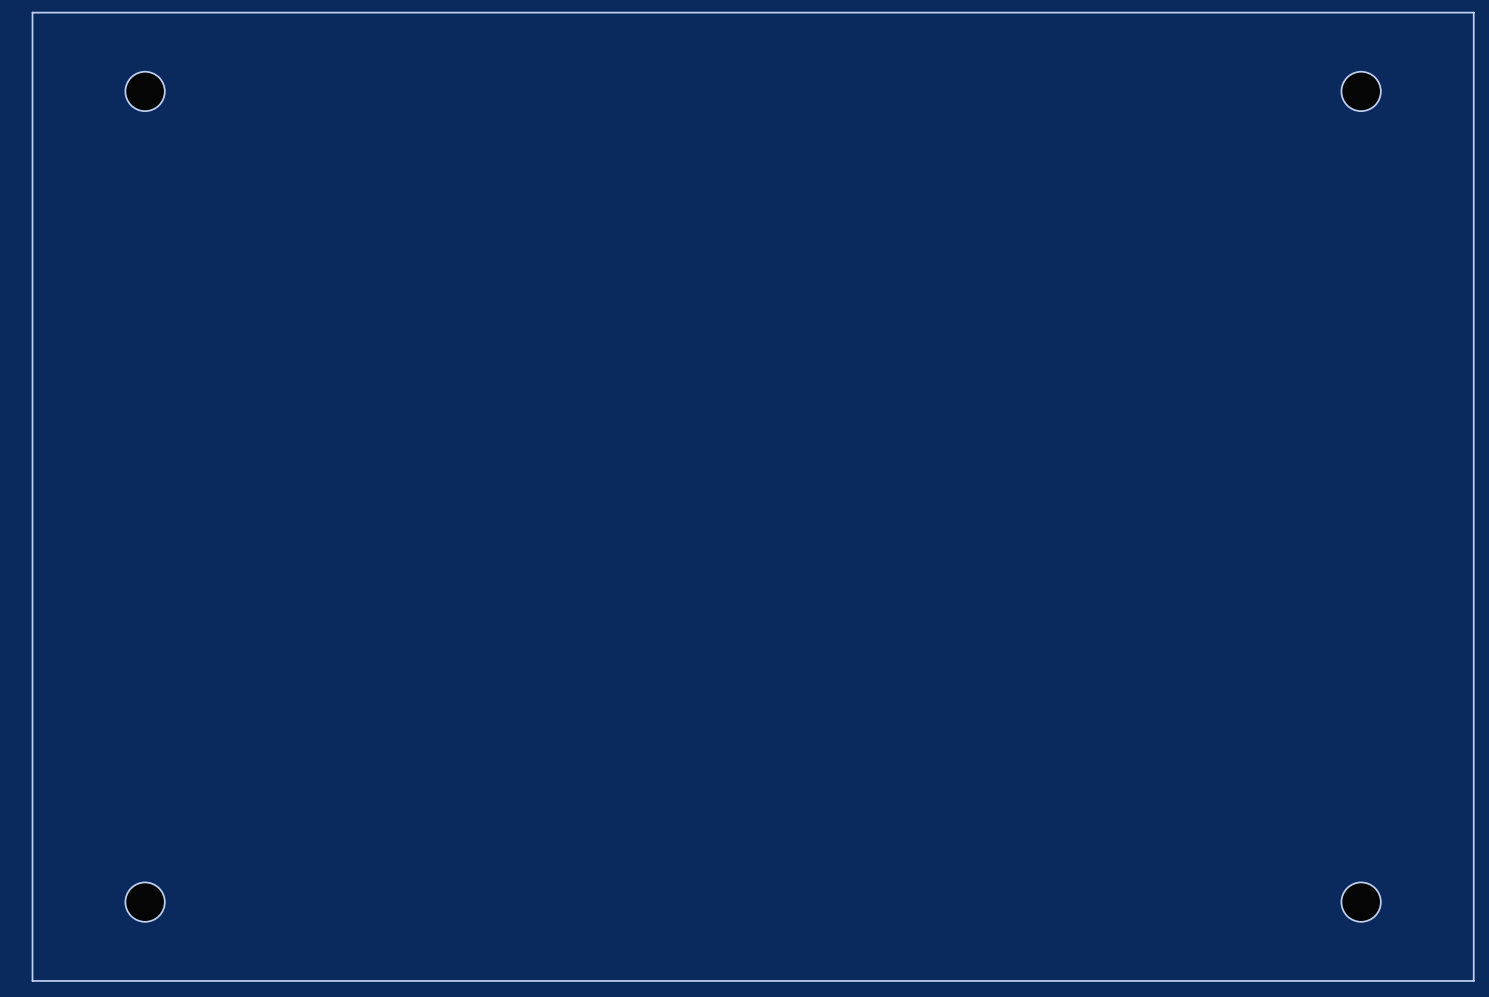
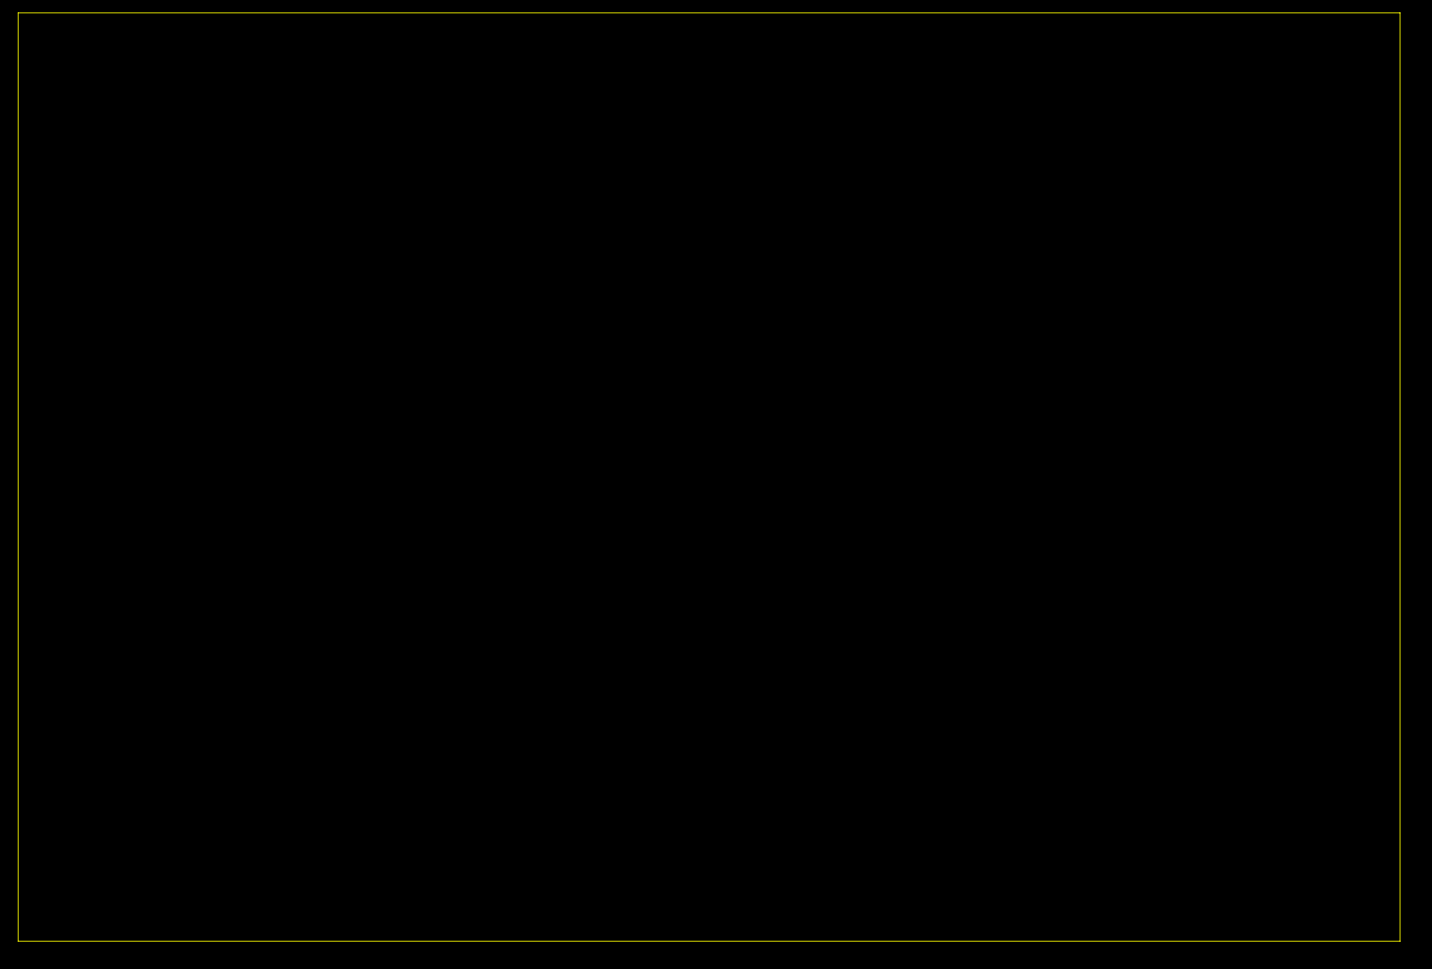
part: (145, 91) -> none
part: (1361, 91) -> none
part: (145, 902) -> none
part: (1361, 902) -> none

